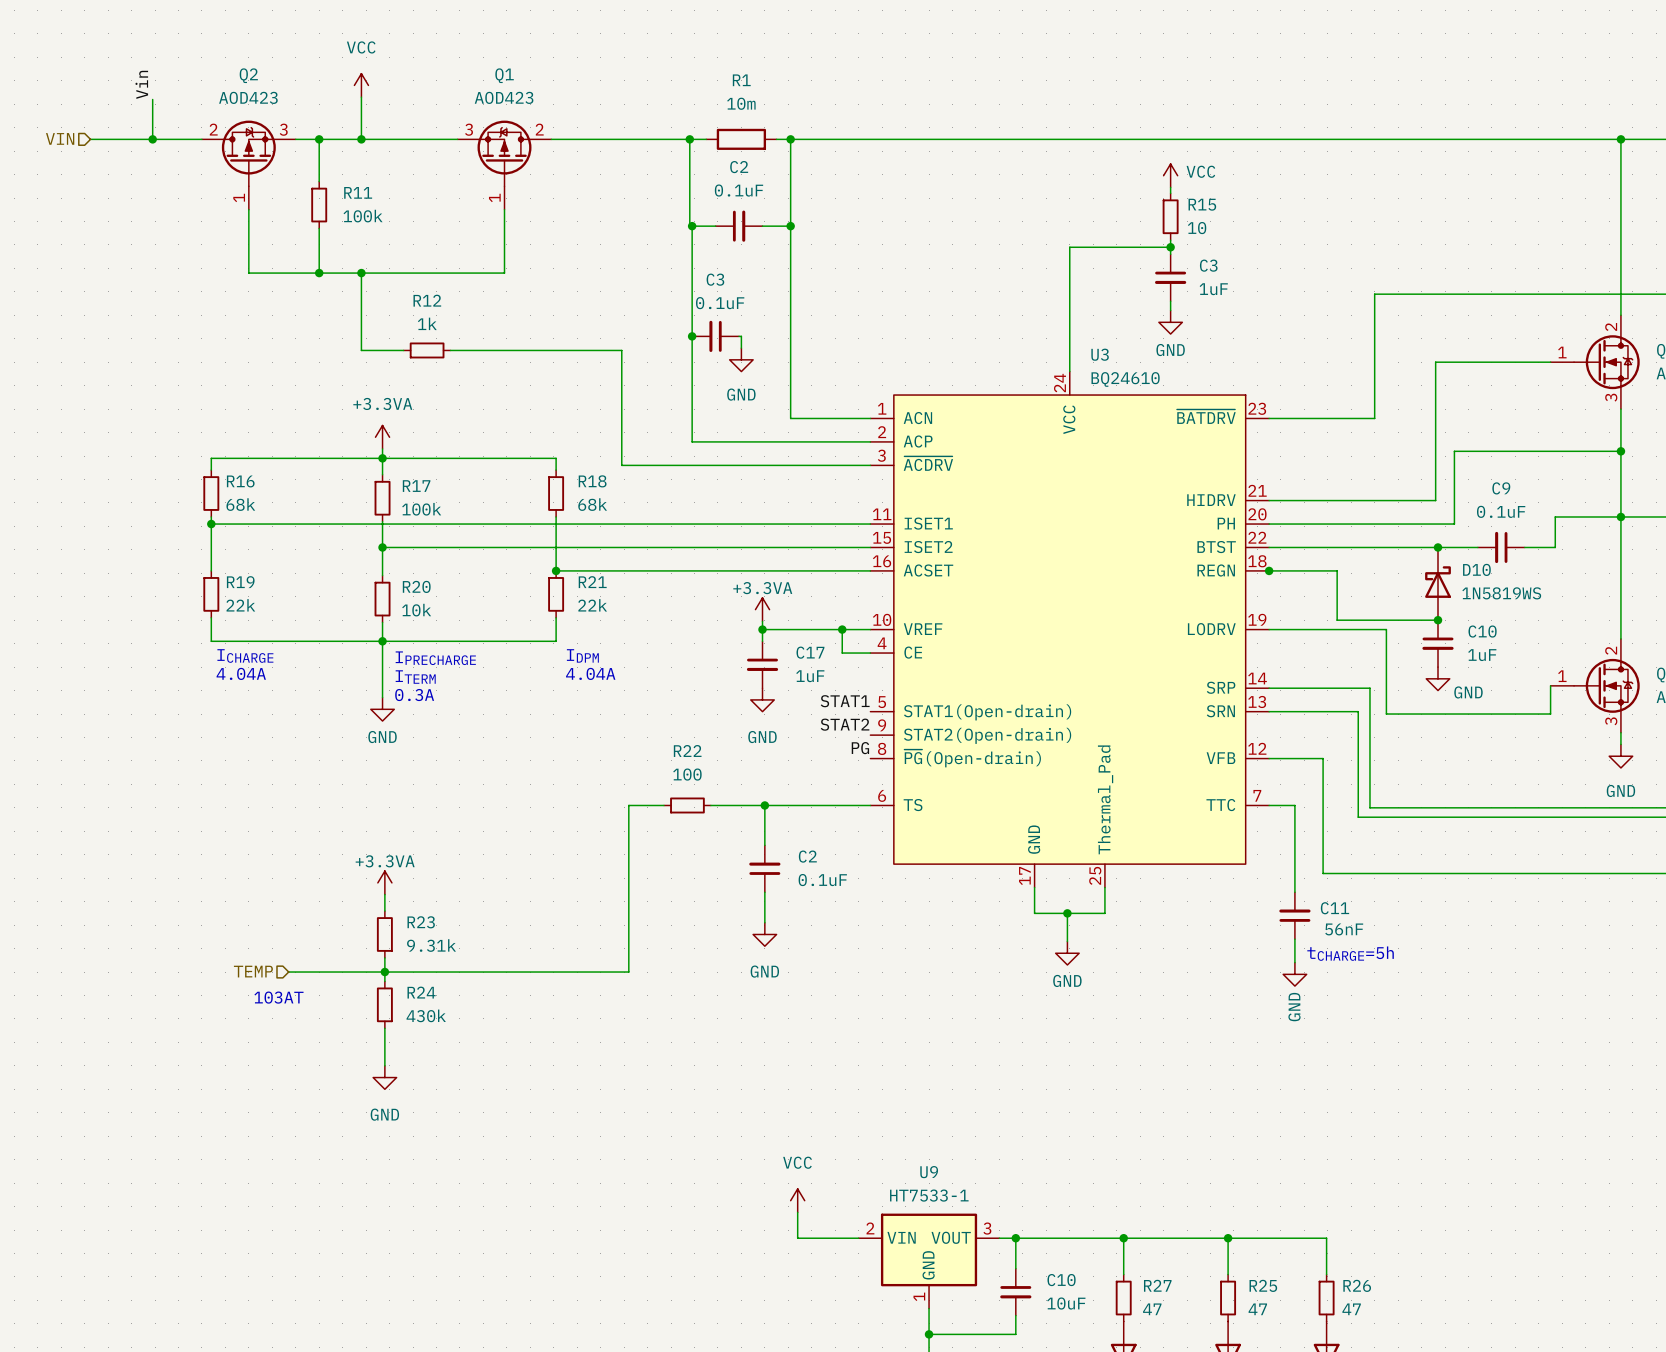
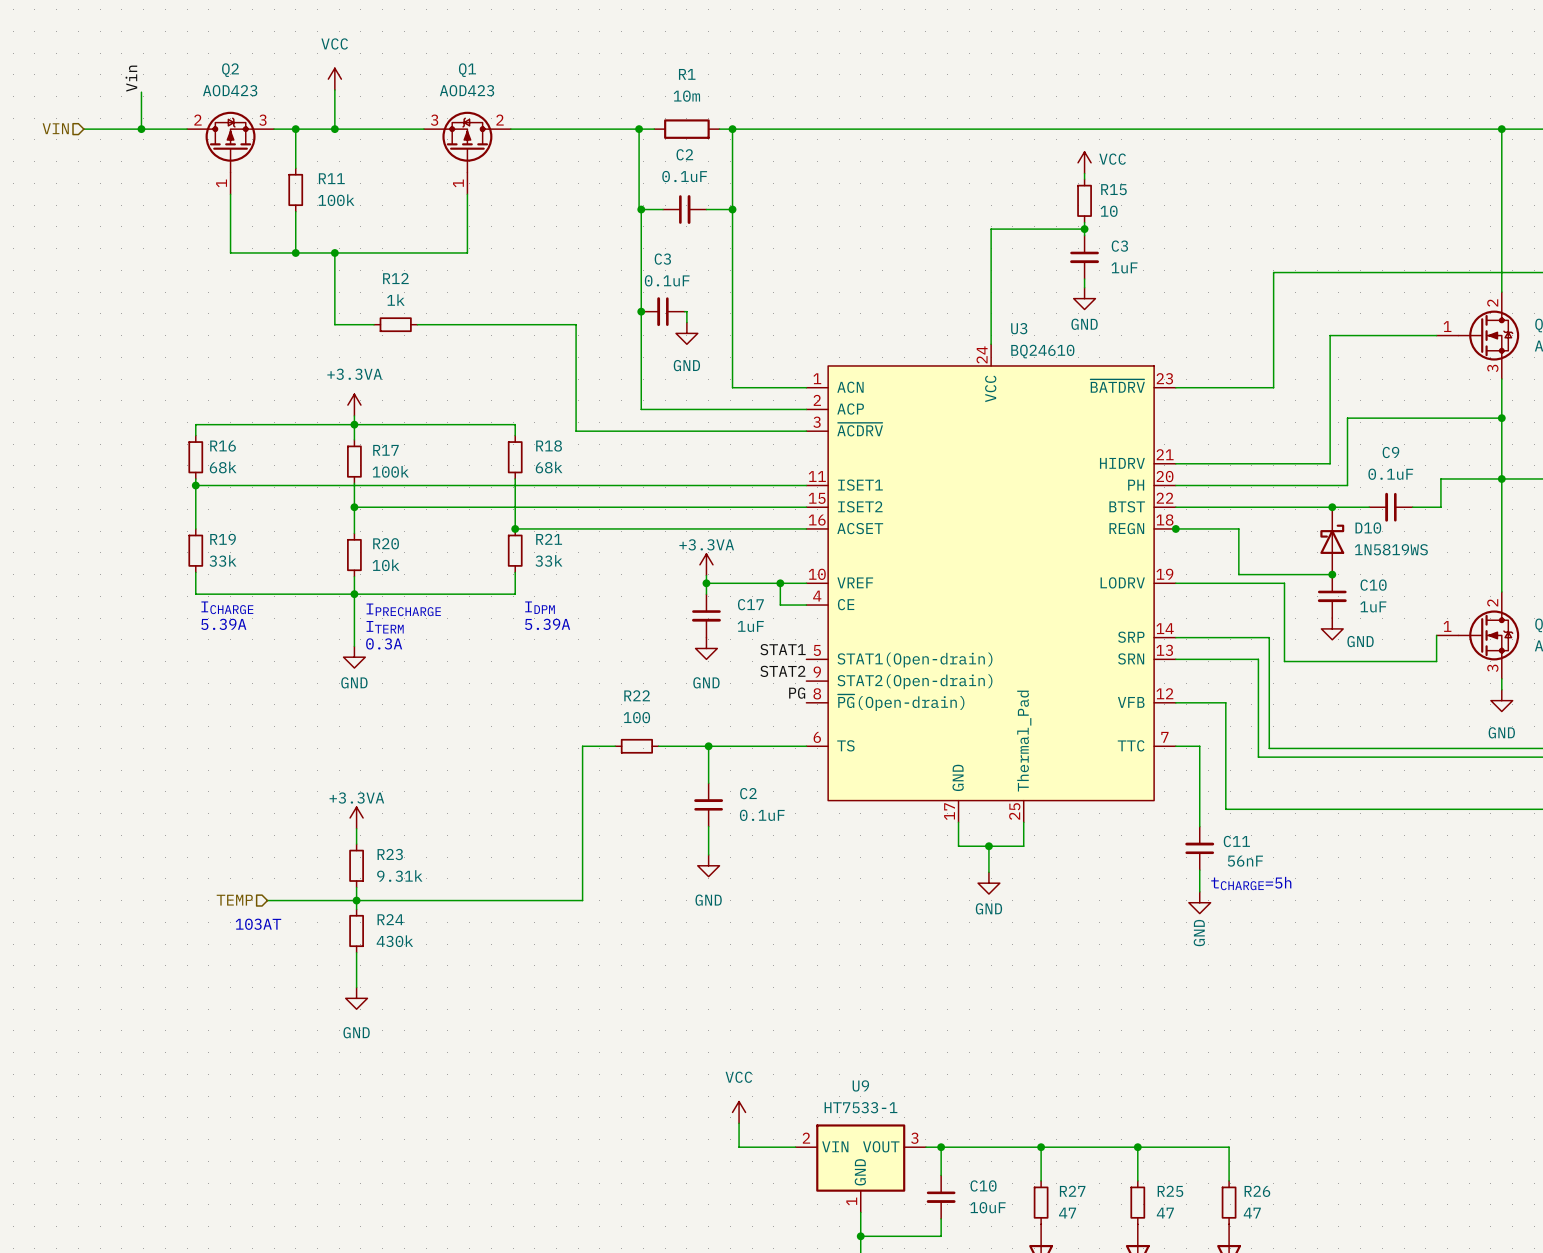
R19 value: 22k (240, 605) -> 33k (223, 560)
R21 value: 22k (592, 605) -> 33k (548, 560)
text: 4.04A (241, 673) -> 5.39A (223, 624)
text: 4.04A (590, 673) -> 5.39A (547, 624)

